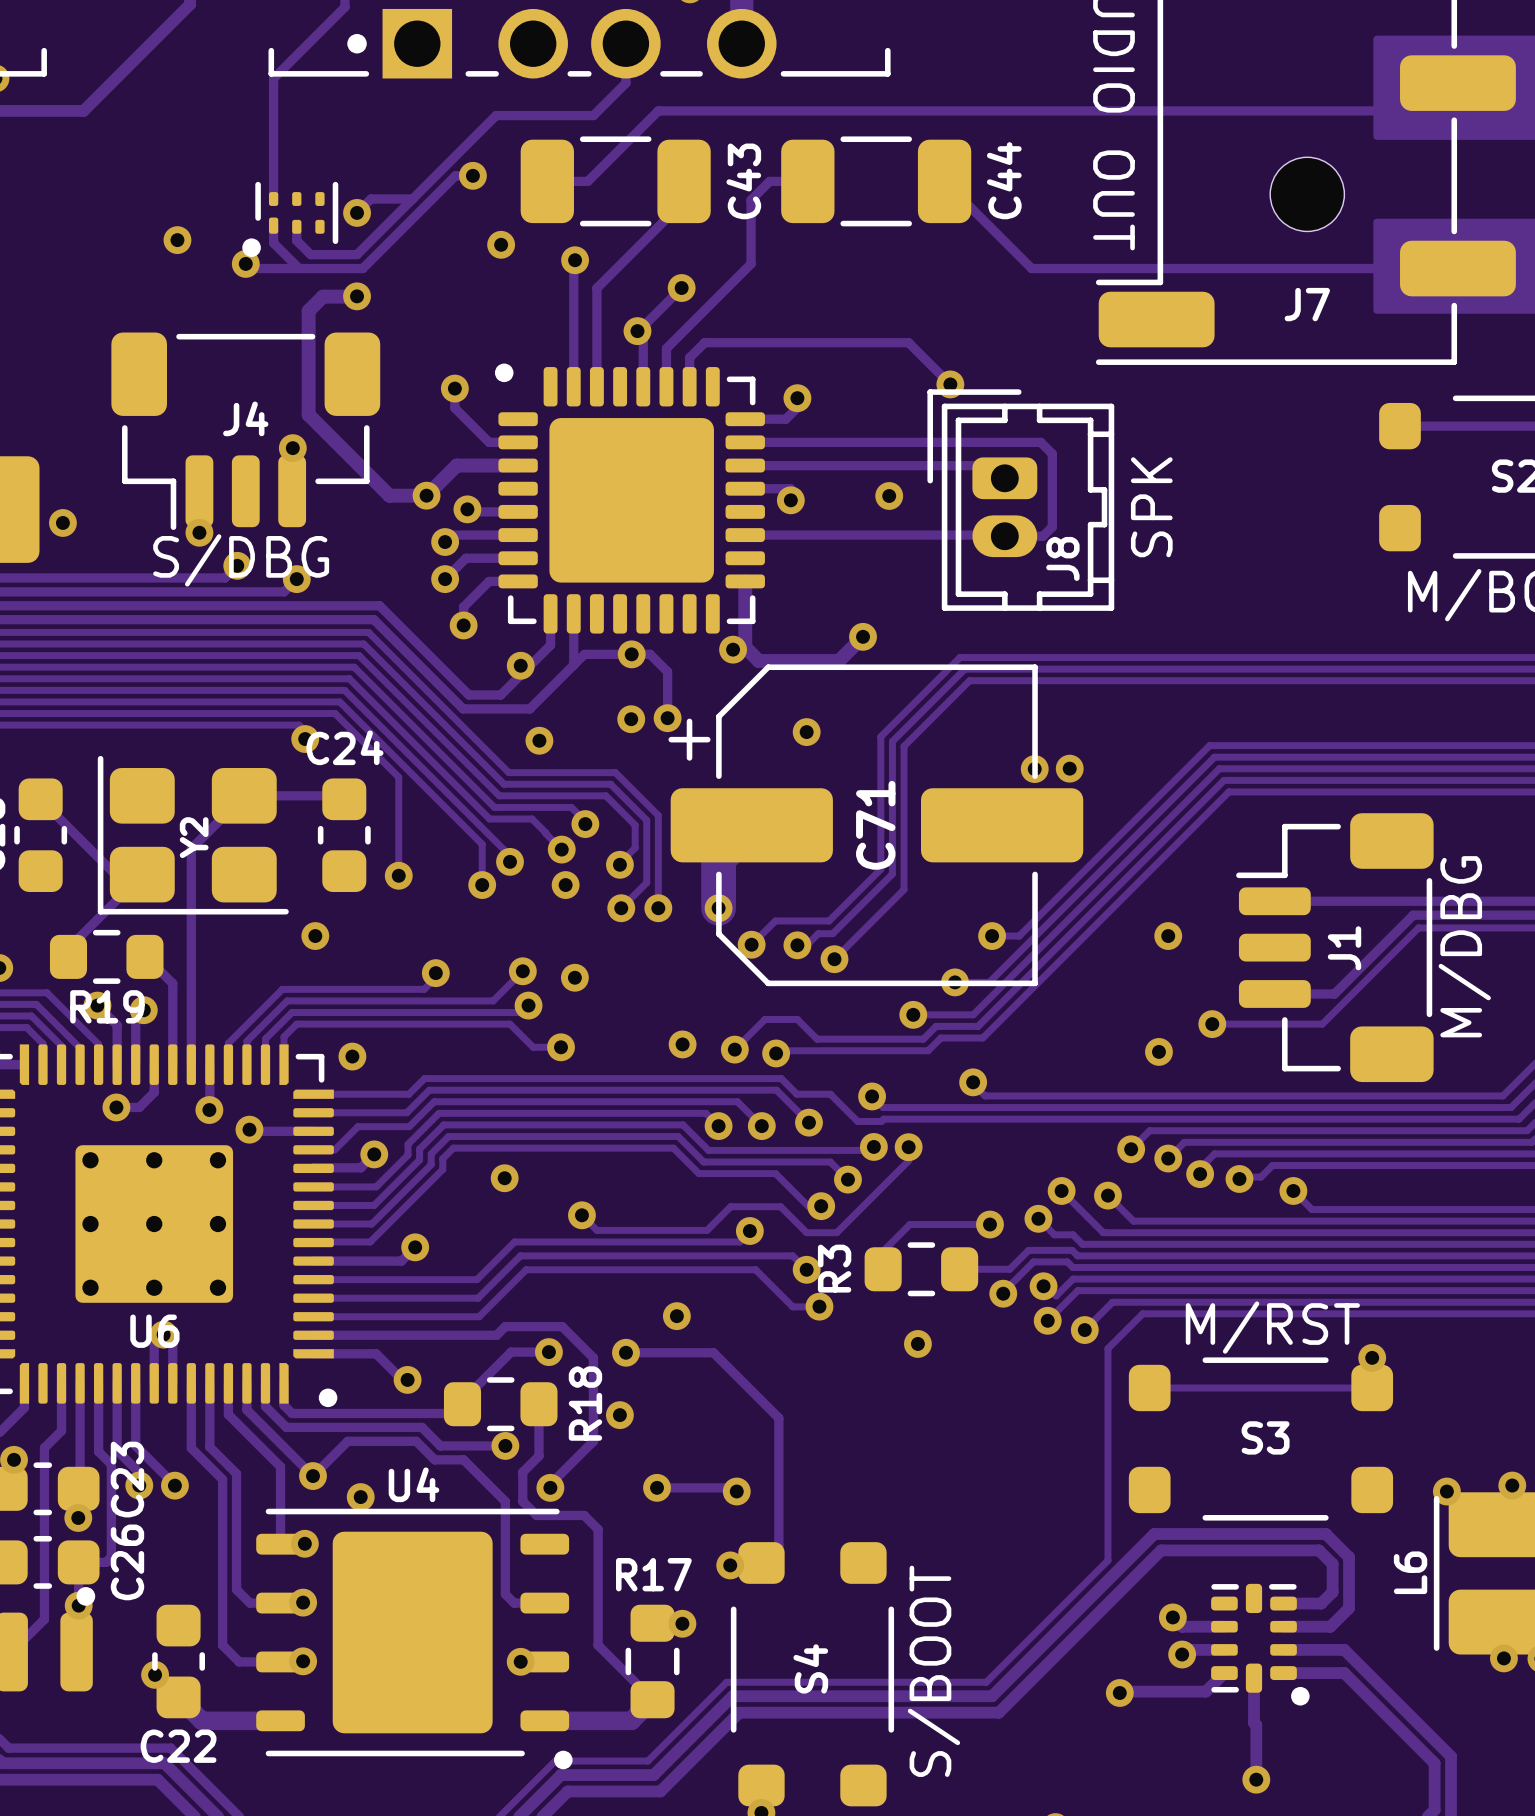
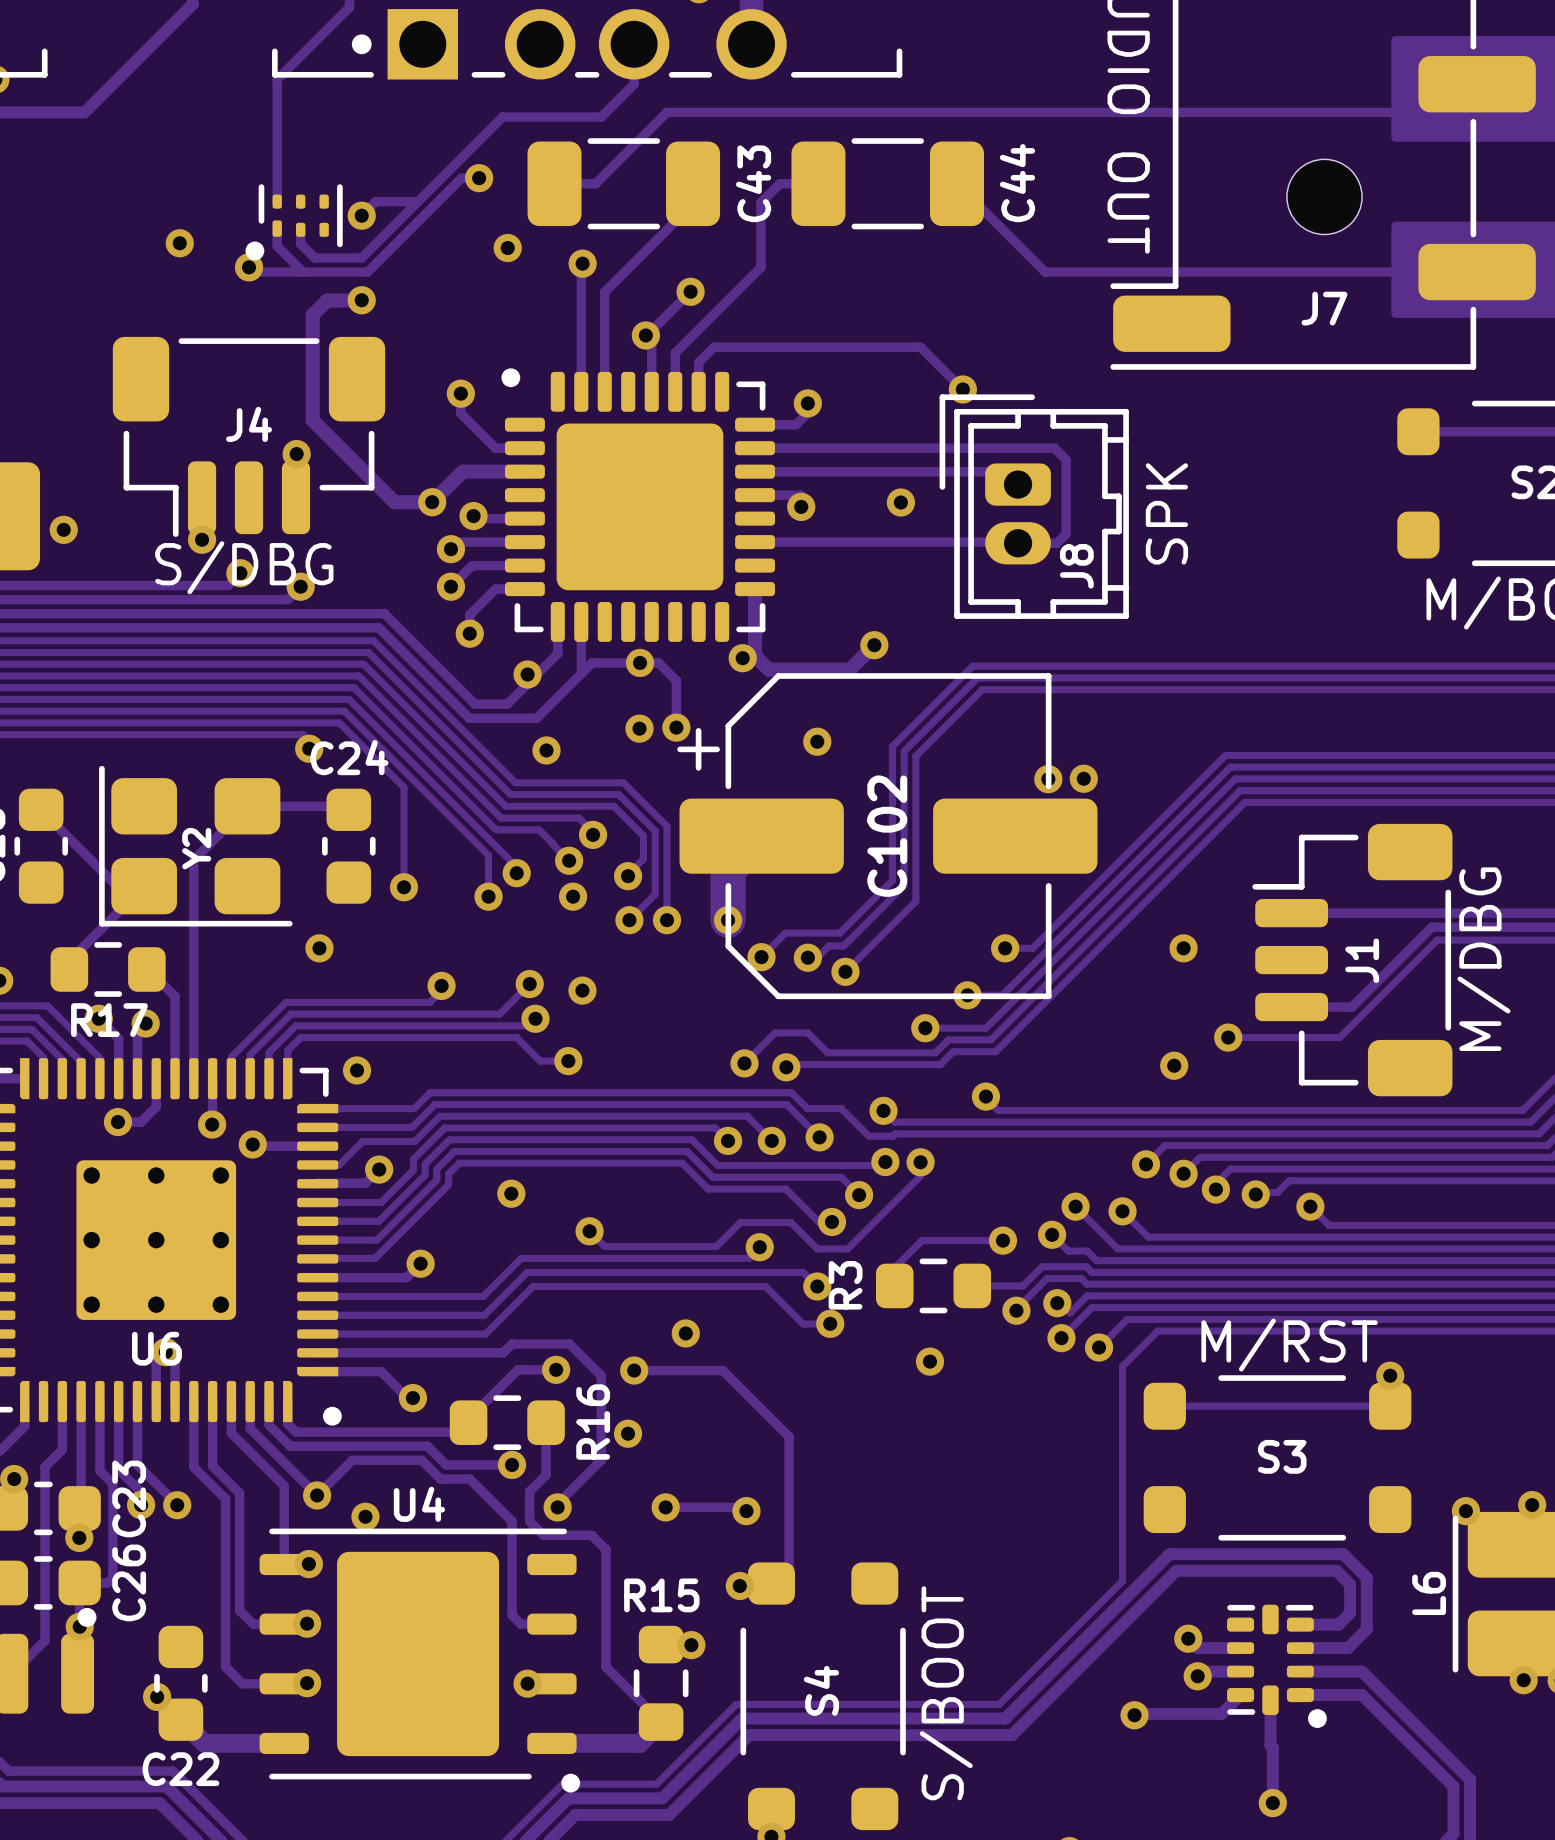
C71 name: C71 (875, 825) -> C102 (887, 836)
R19 name: R19 (107, 1006) -> R17 (109, 1020)
via: (682, 1044) -> none
R18 name: R18 (585, 1403) -> R16 (593, 1422)
R17 name: R17 (653, 1574) -> R15 (661, 1595)

